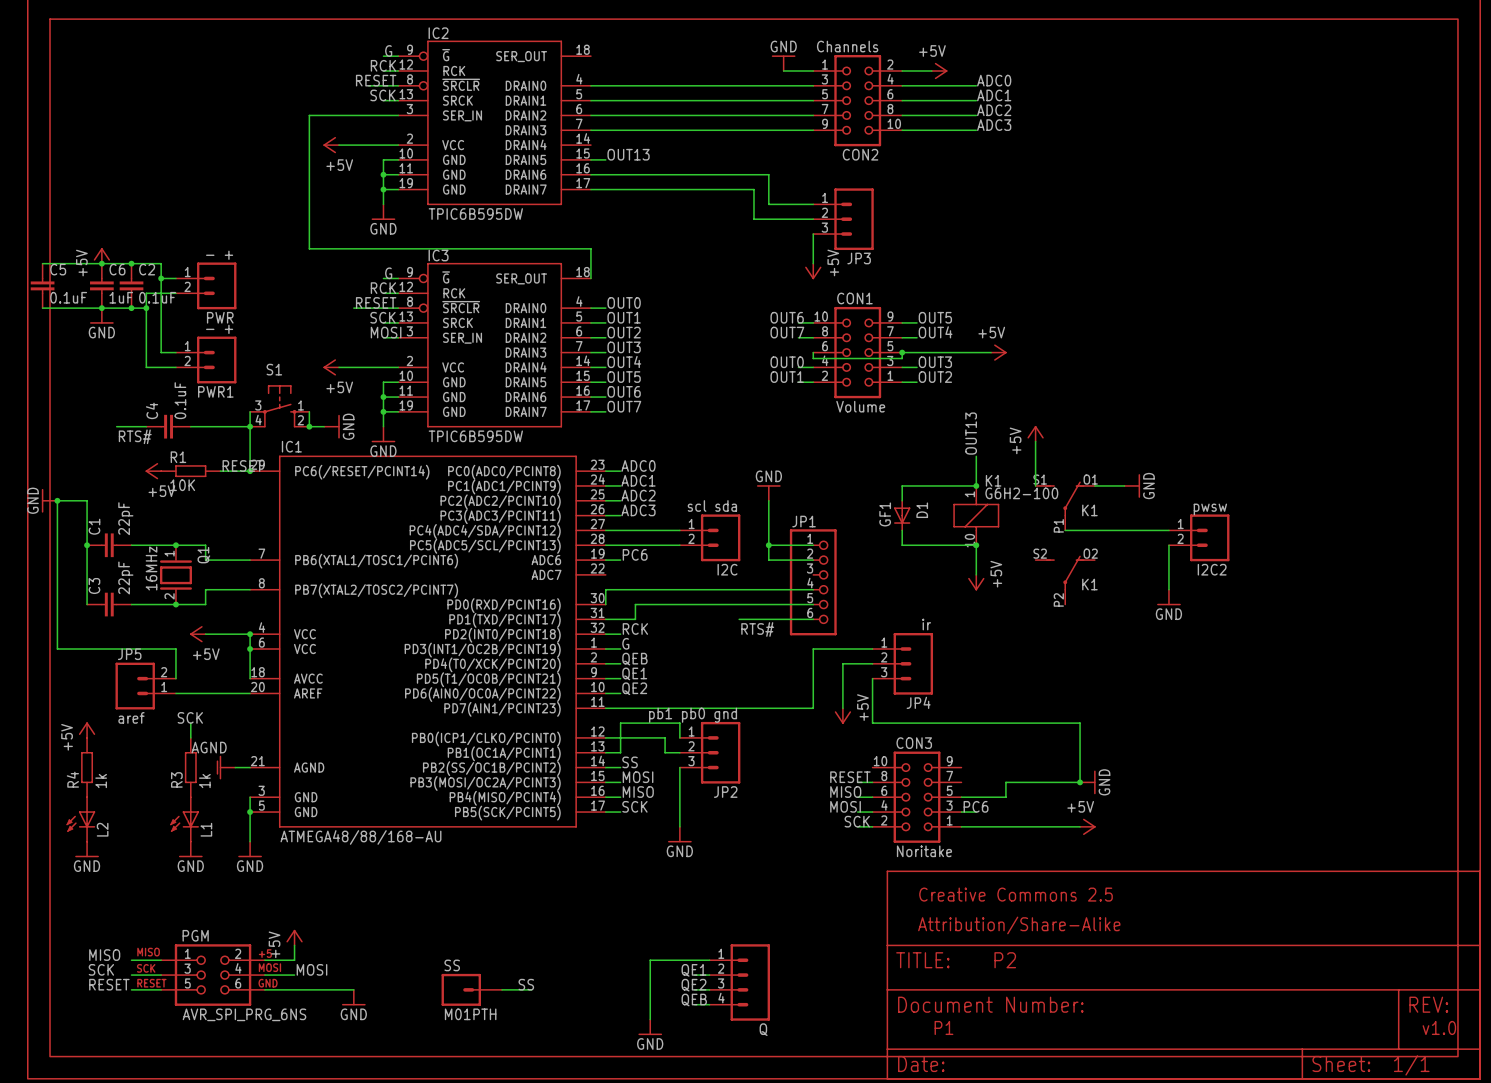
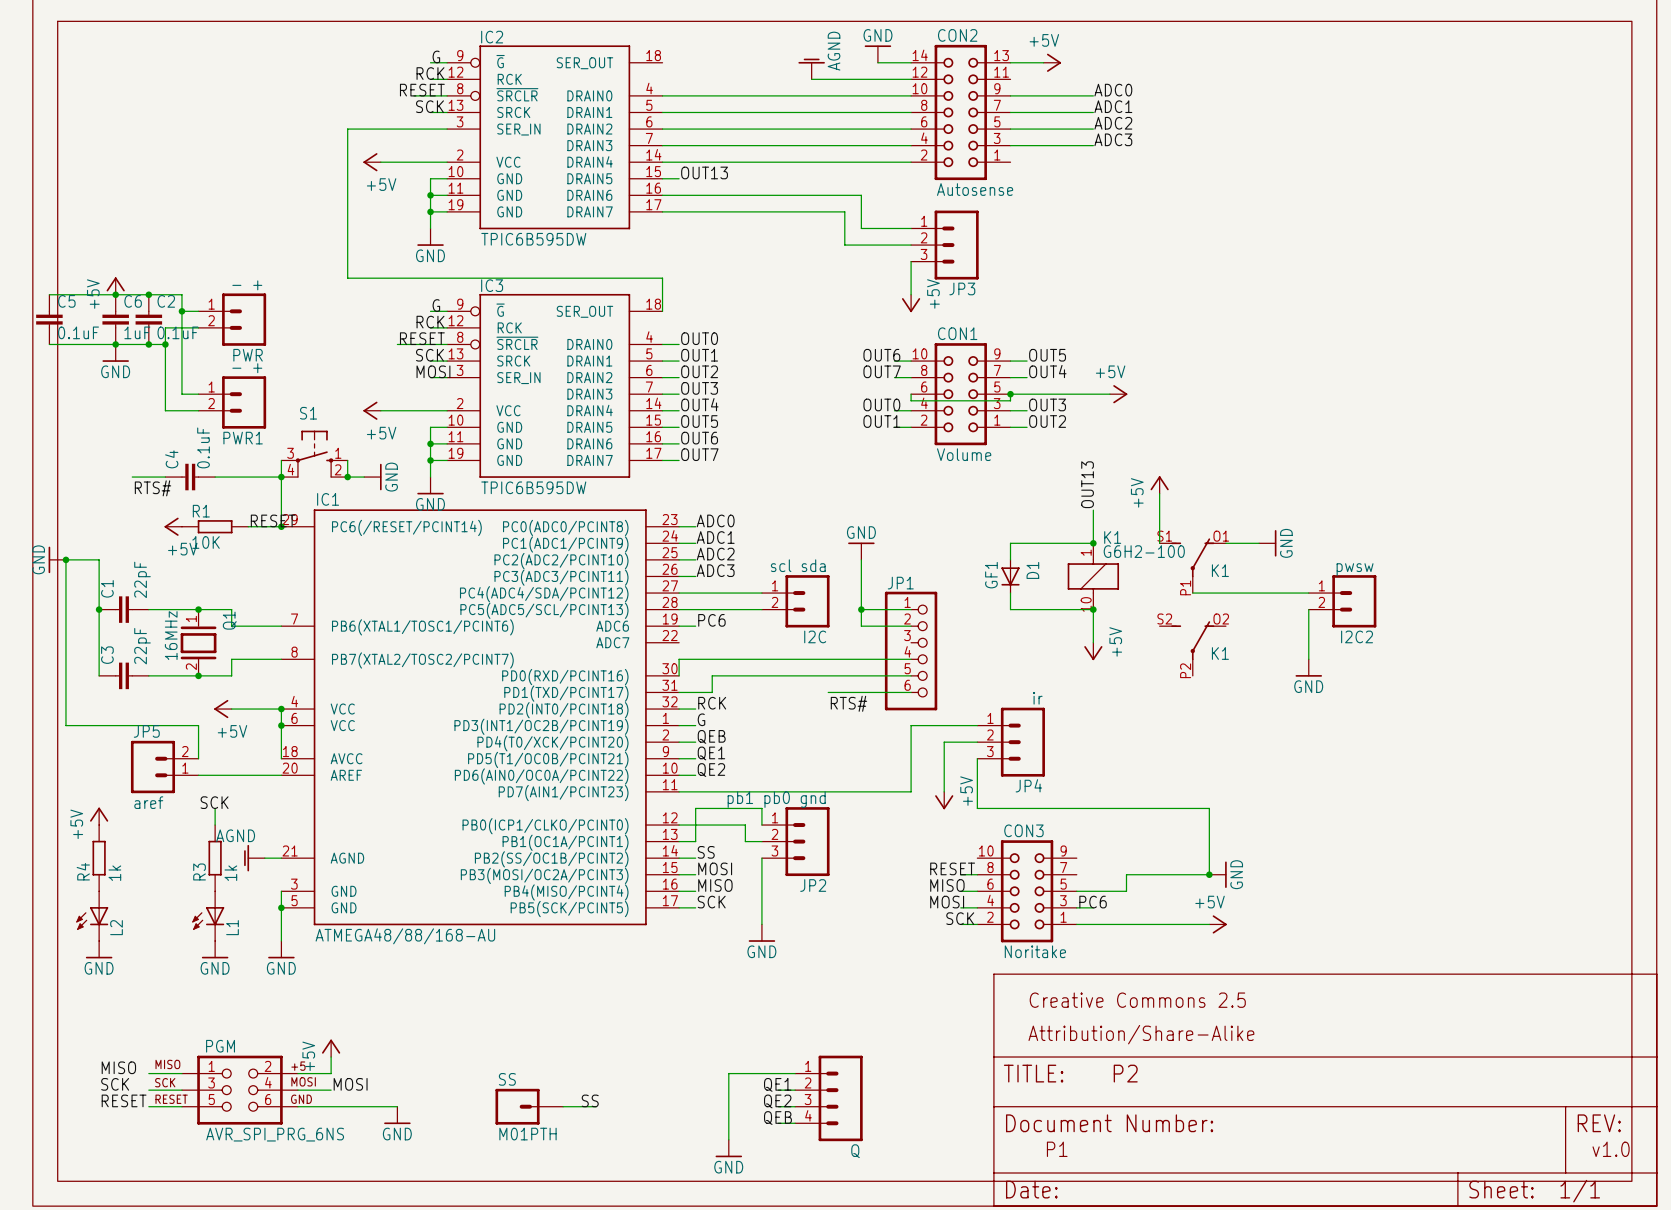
CON2 value: Channels (847, 46) -> Autosense (975, 189)
CON2 symbol: [813, 54, 903, 147] -> [911, 44, 1011, 181]
wire: none -> (877, 62) (911, 62)
power symbol: none -> AGND (811, 68)
power symbol position: GND (783, 63) -> GND (877, 54)
wire: none -> (811, 79) (877, 79)
wire: (902, 70) (931, 70) -> (1010, 62) (1043, 62)
power symbol position: +5V (939, 70) -> +5V (1052, 62)
wire: none -> (662, 162) (911, 162)
CON2 name position: CON2 (860, 154) -> CON2 (957, 35)

